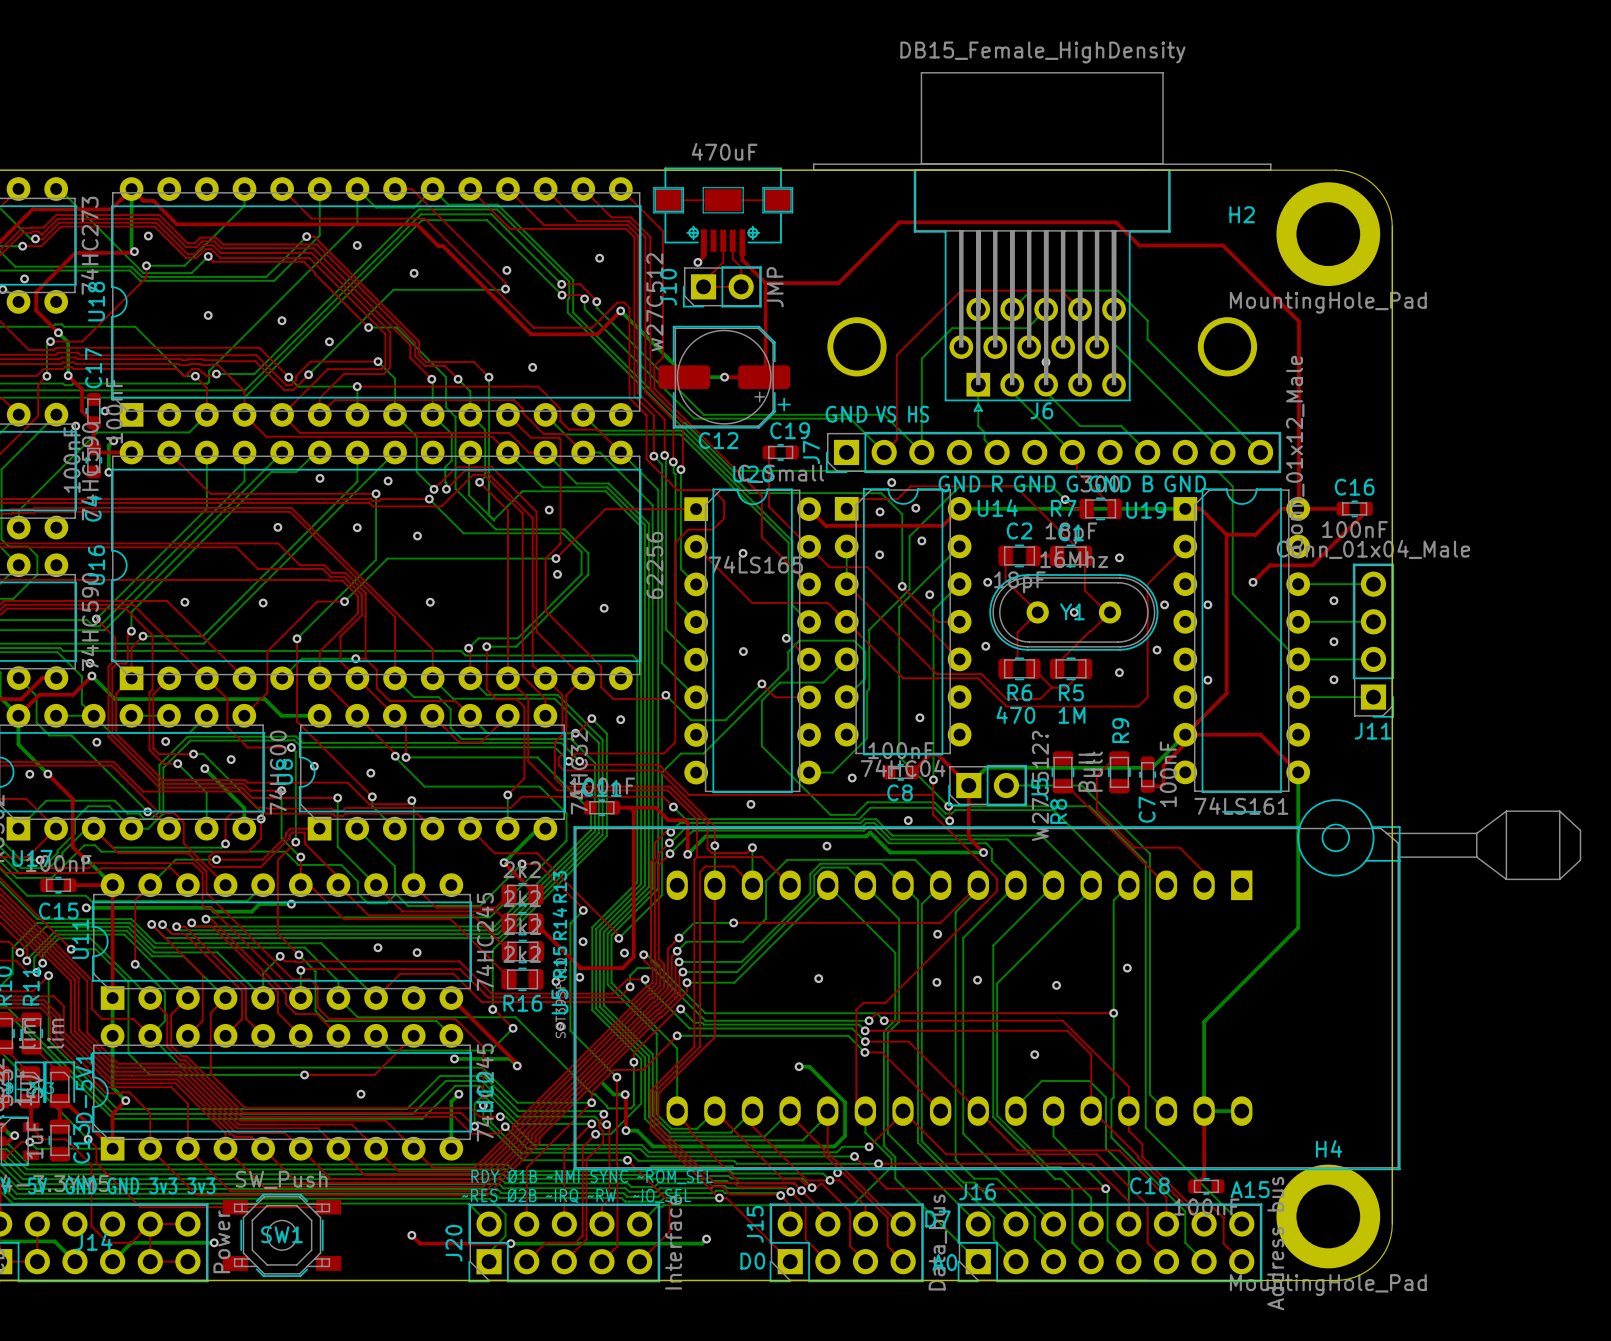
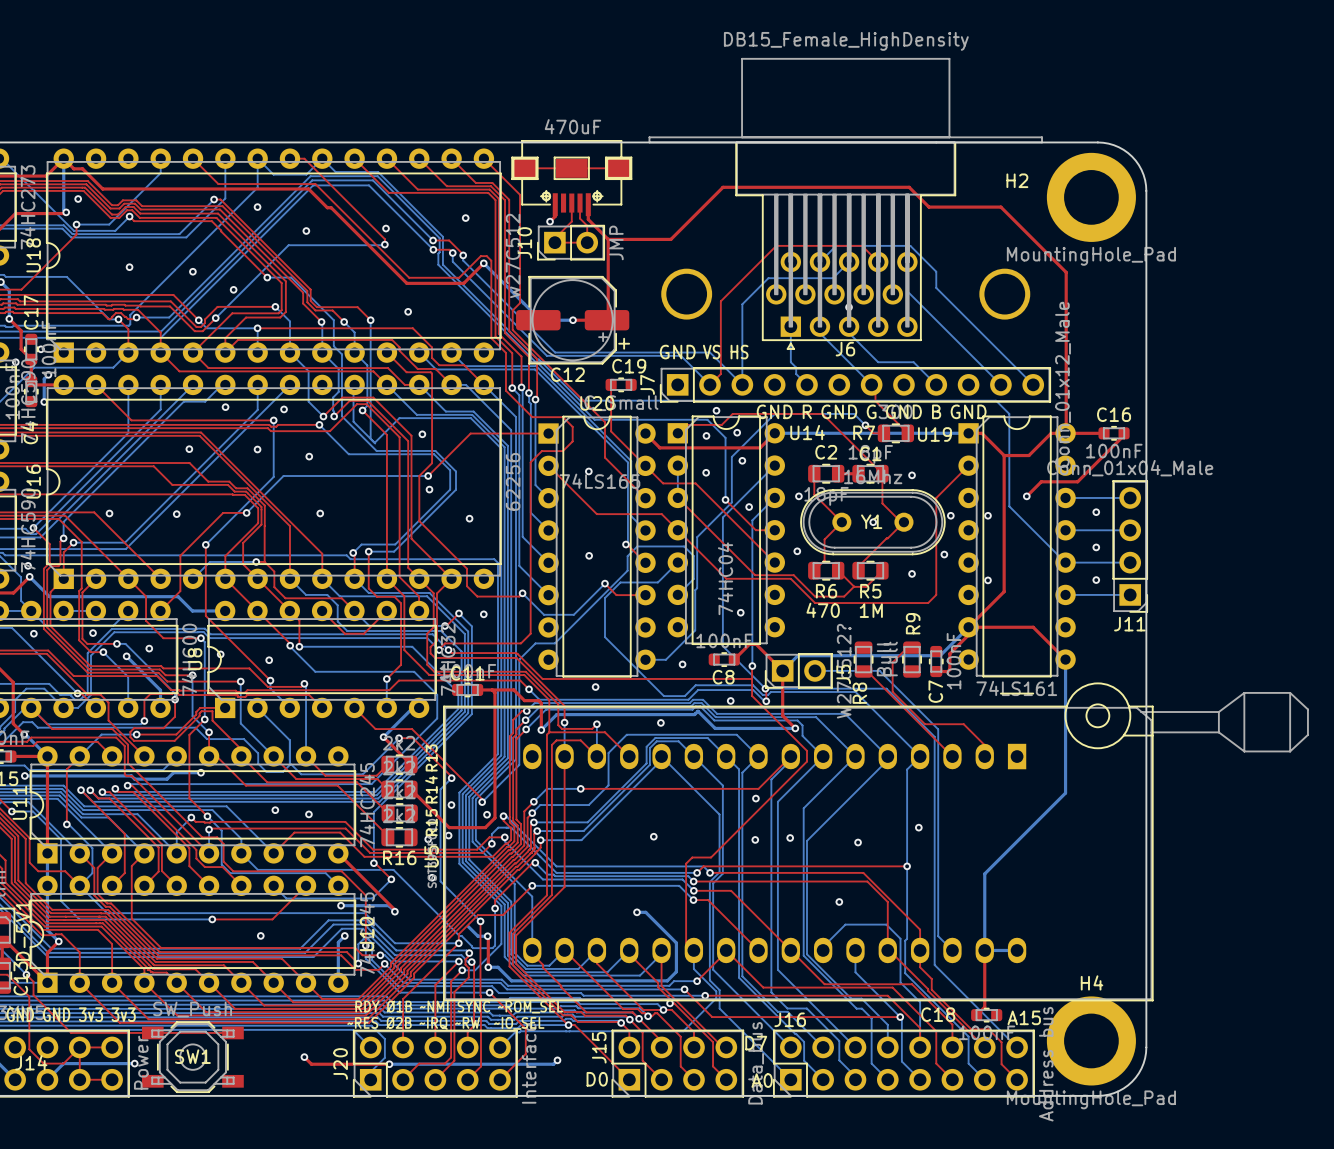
U14 value rotation: 0° (903, 768) -> 90° counterclockwise (725, 578)

